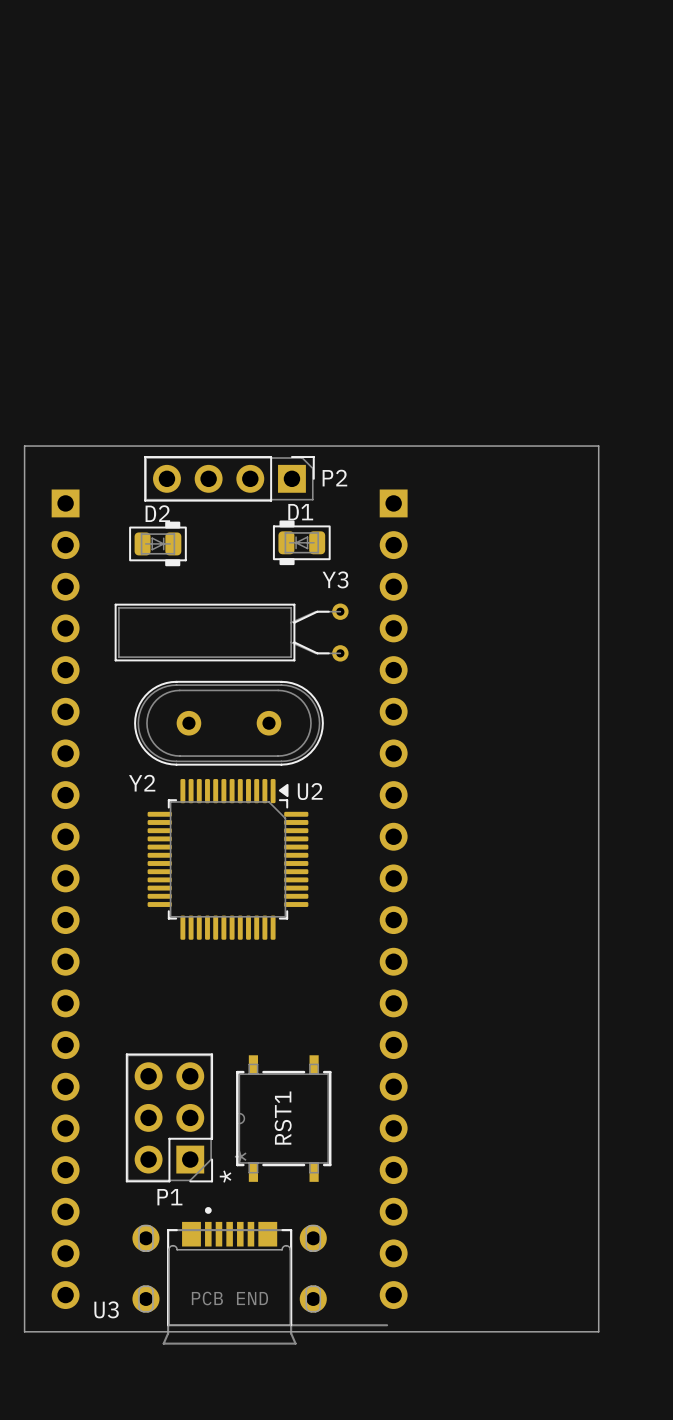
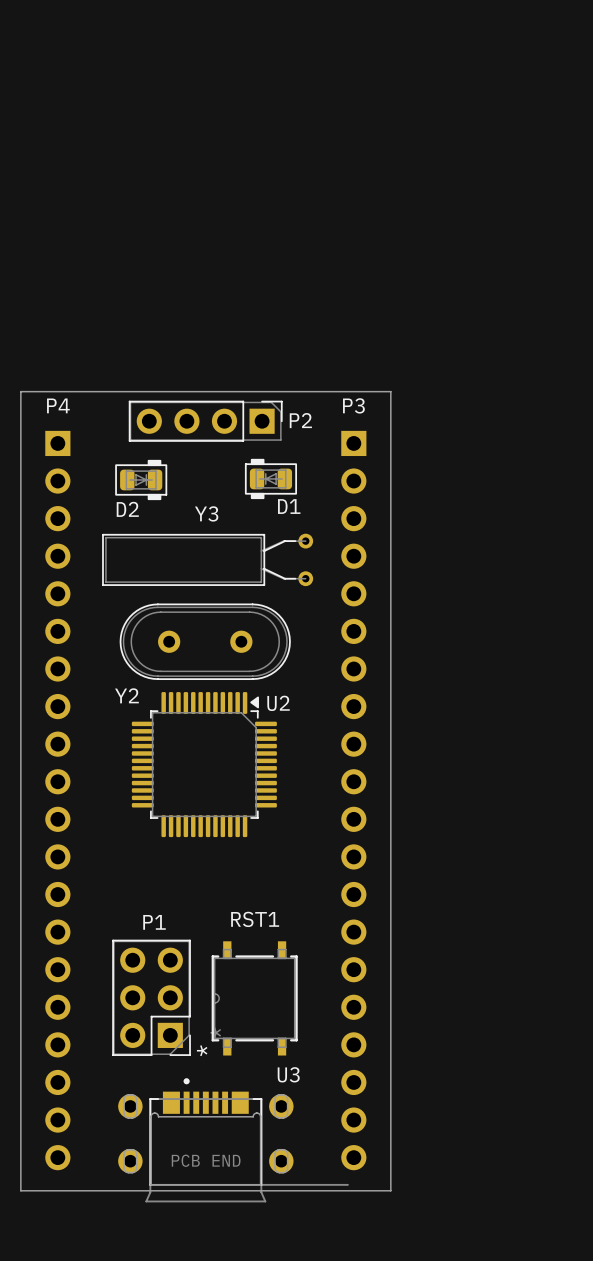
board edge: (434, 446) (598, 446) (598, 1331) (434, 1331) -> (390, 391) (390, 1190)
P4 name: none -> P4 (58, 405)
P3 name: none -> P3 (353, 405)
D1 name position: D1 (300, 512) -> D1 (289, 506)
D2 name position: D2 (157, 513) -> D2 (127, 509)
Y3 name position: Y3 (335, 579) -> Y3 (206, 513)
RST1 name rotation: 0° (283, 1118) -> 90° clockwise (255, 919)
RST1 name position: RST1 (283, 1118) -> RST1 (255, 919)
P1 name position: P1 (169, 1197) -> P1 (154, 922)
U3 name position: U3 (106, 1309) -> U3 (288, 1074)

